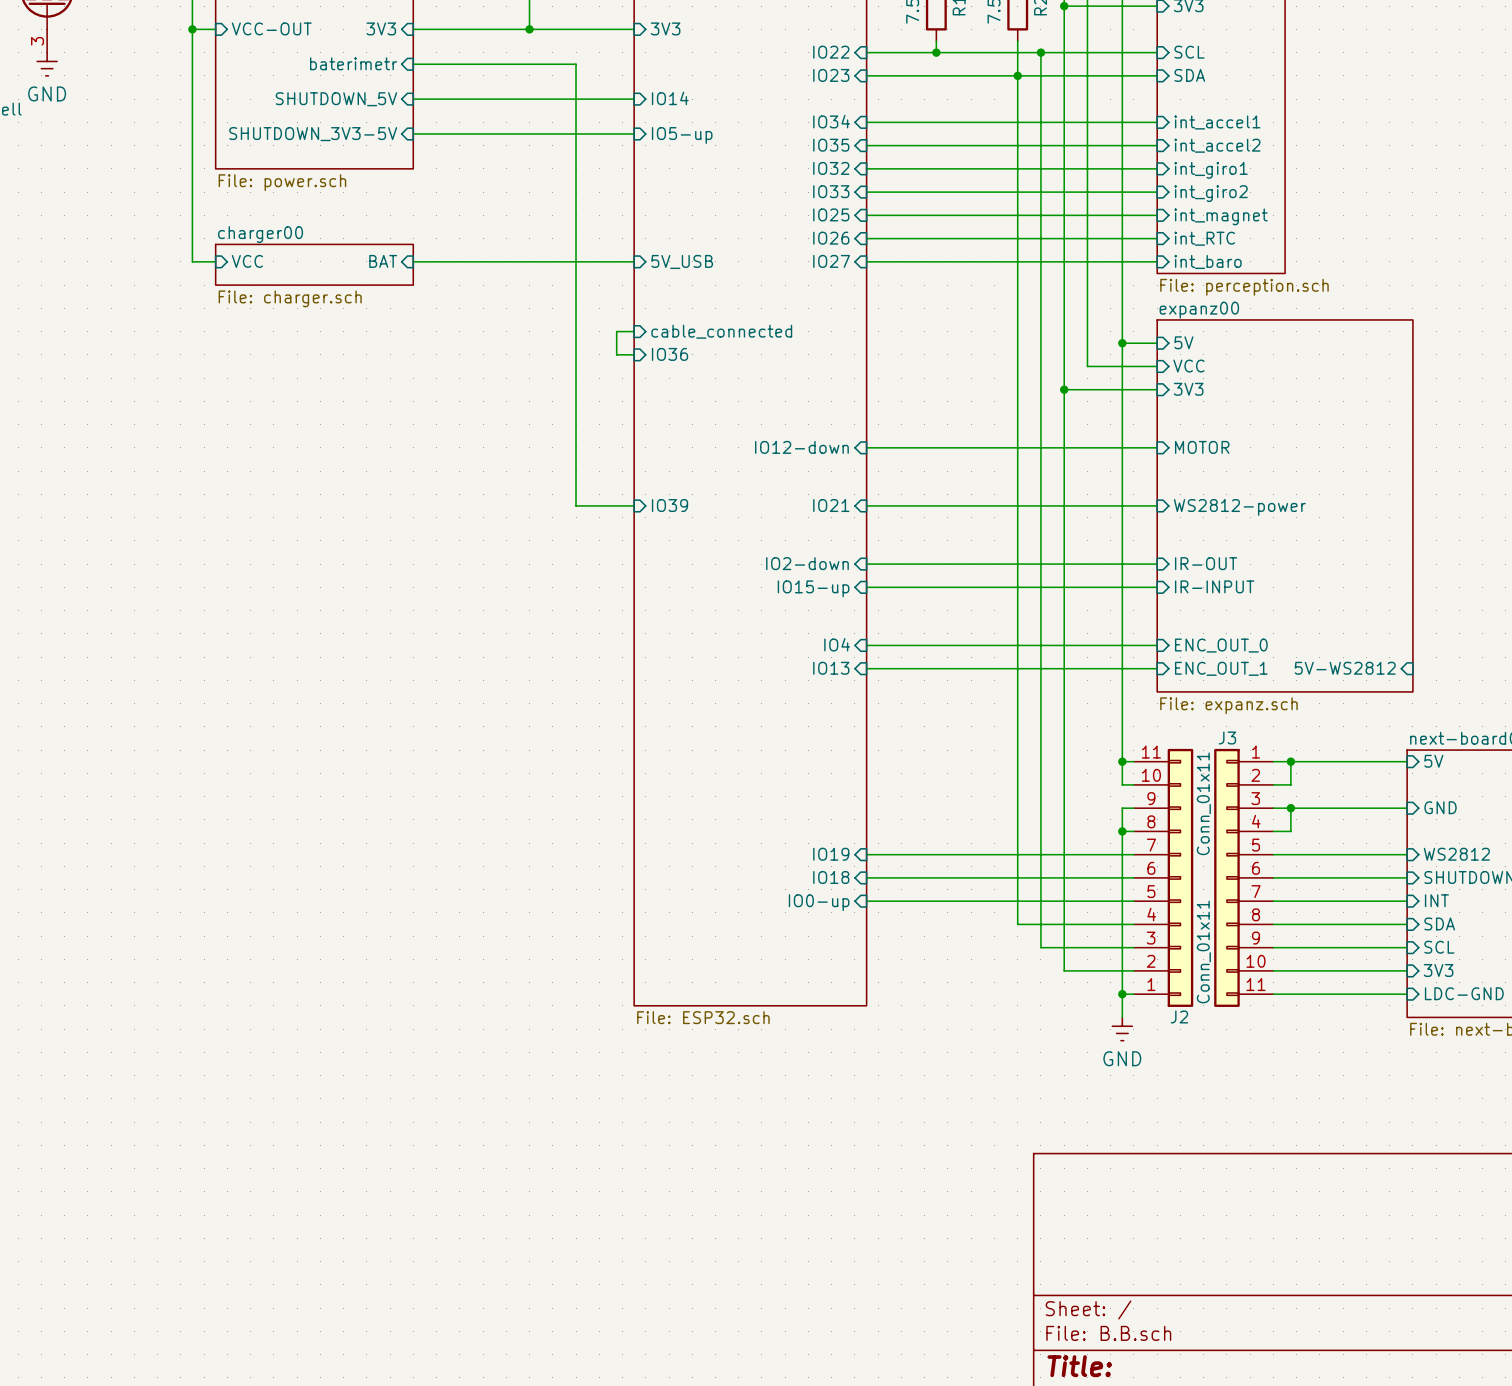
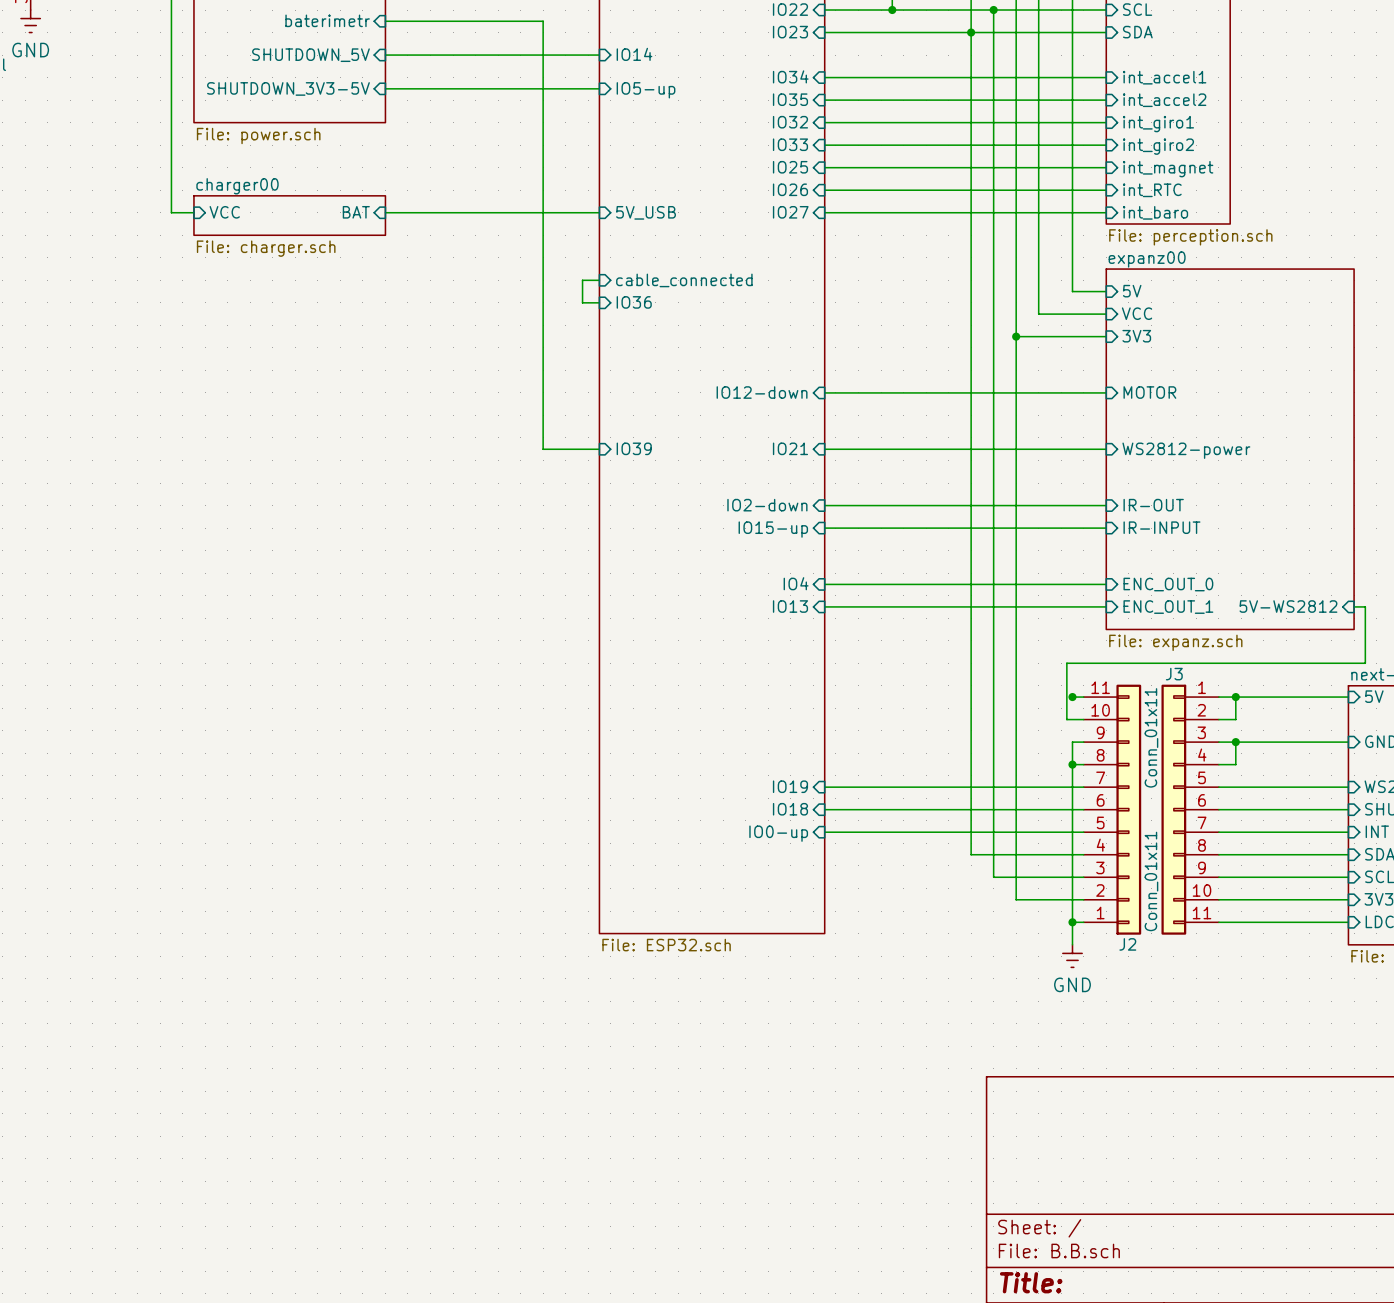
wire: (1122, 343) (1122, 784) -> (1354, 606) (1365, 606) (1365, 663) (1066, 663) (1066, 719) (1072, 719)
junction: (1122, 343) -> none

